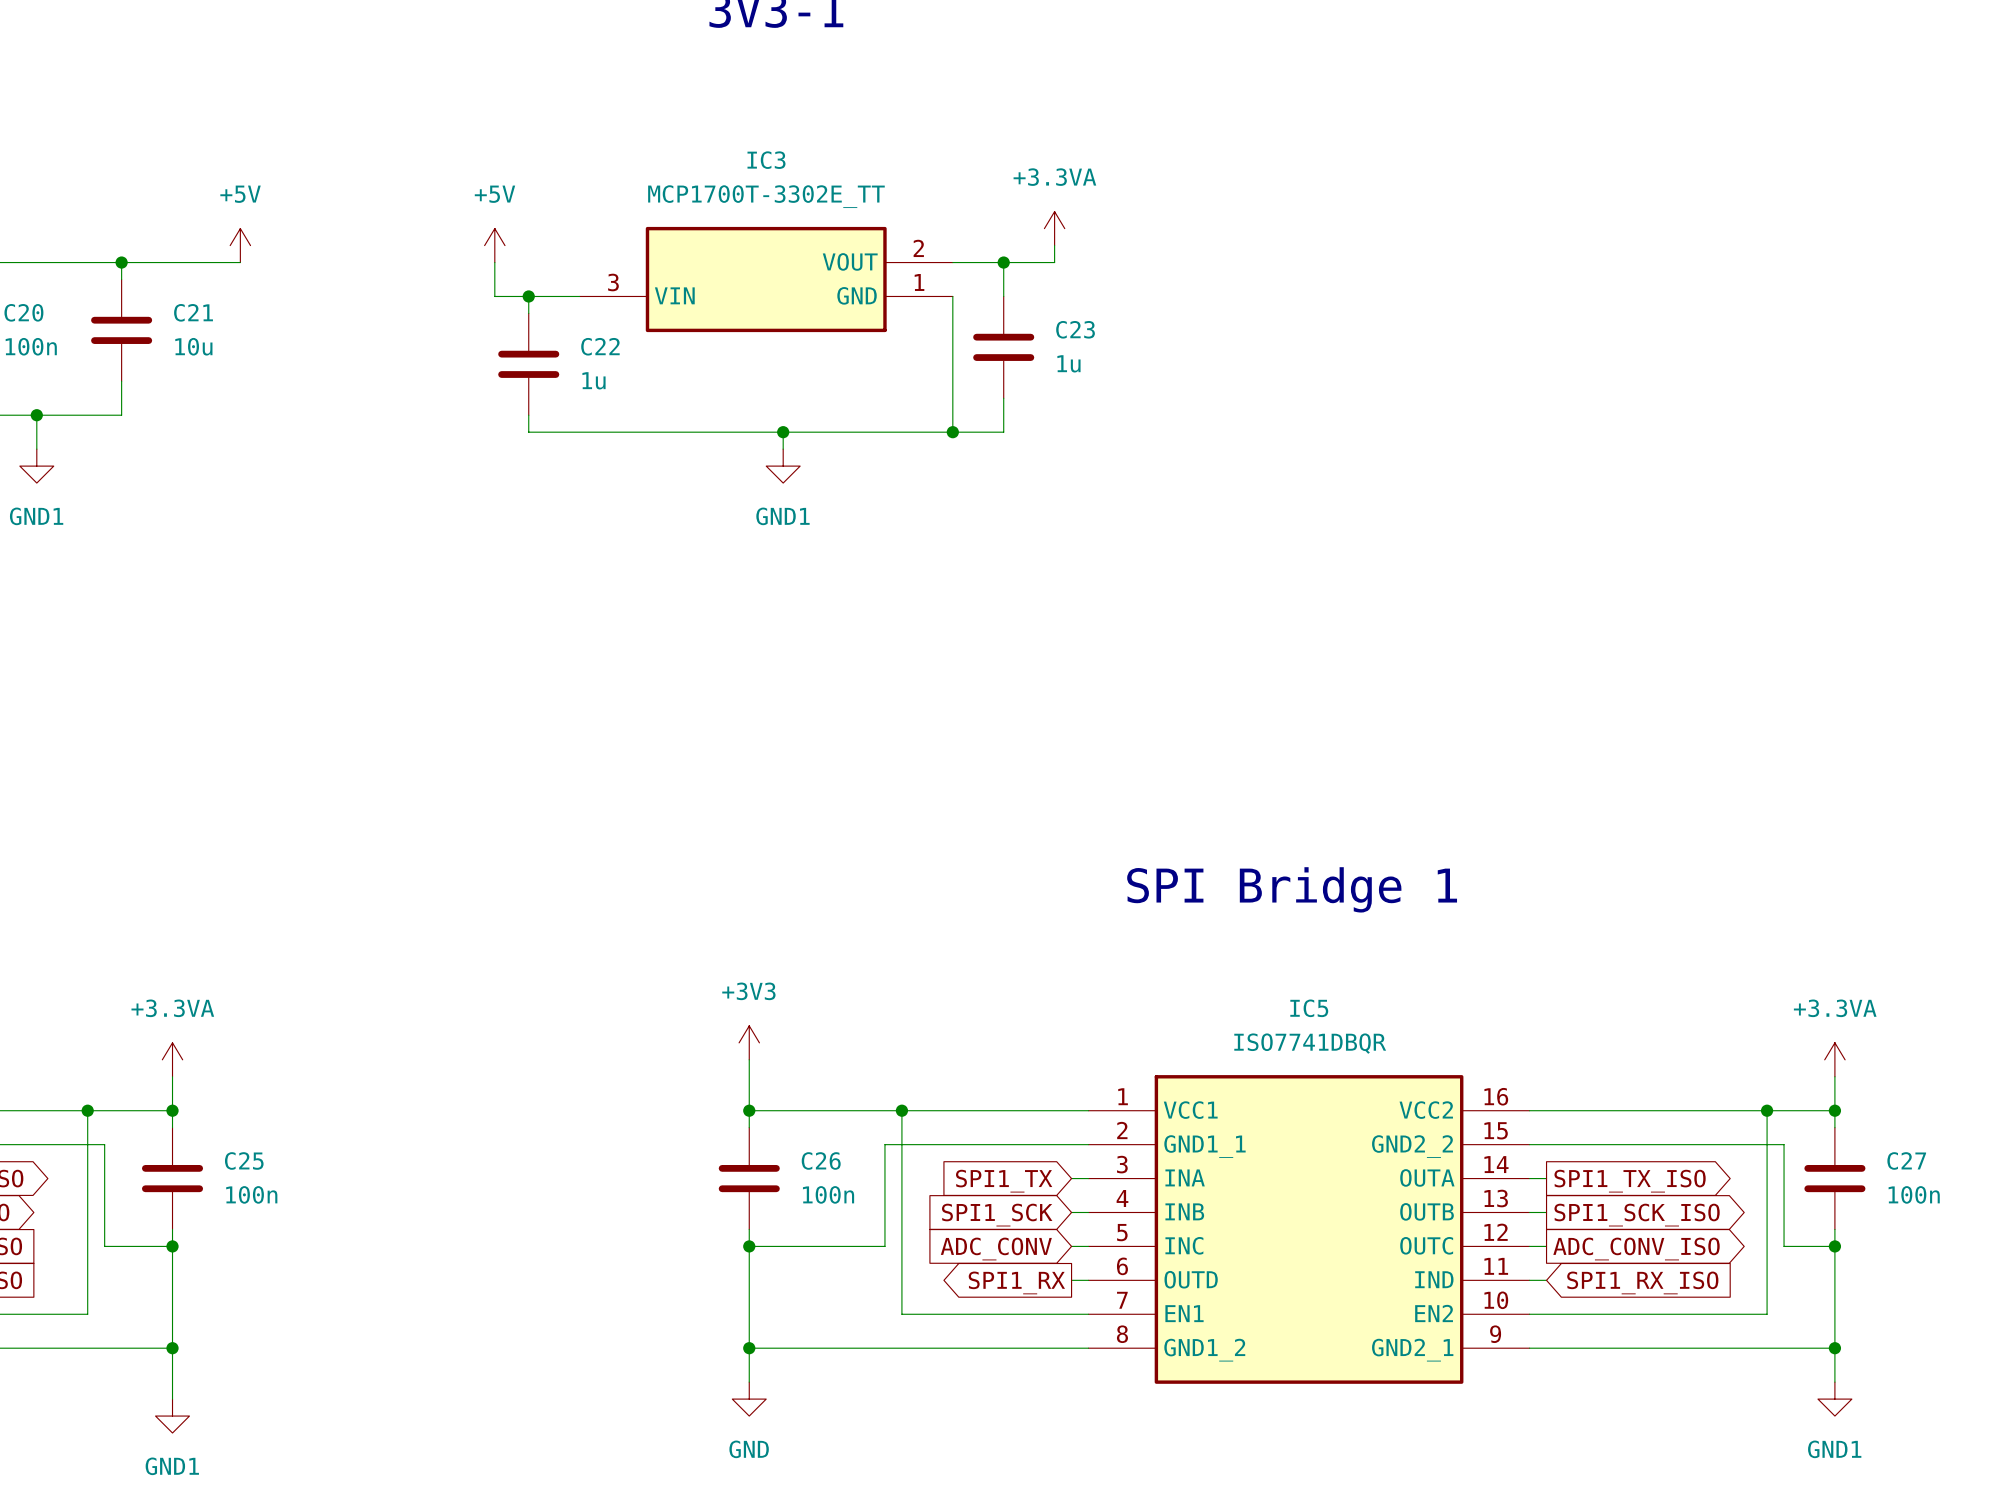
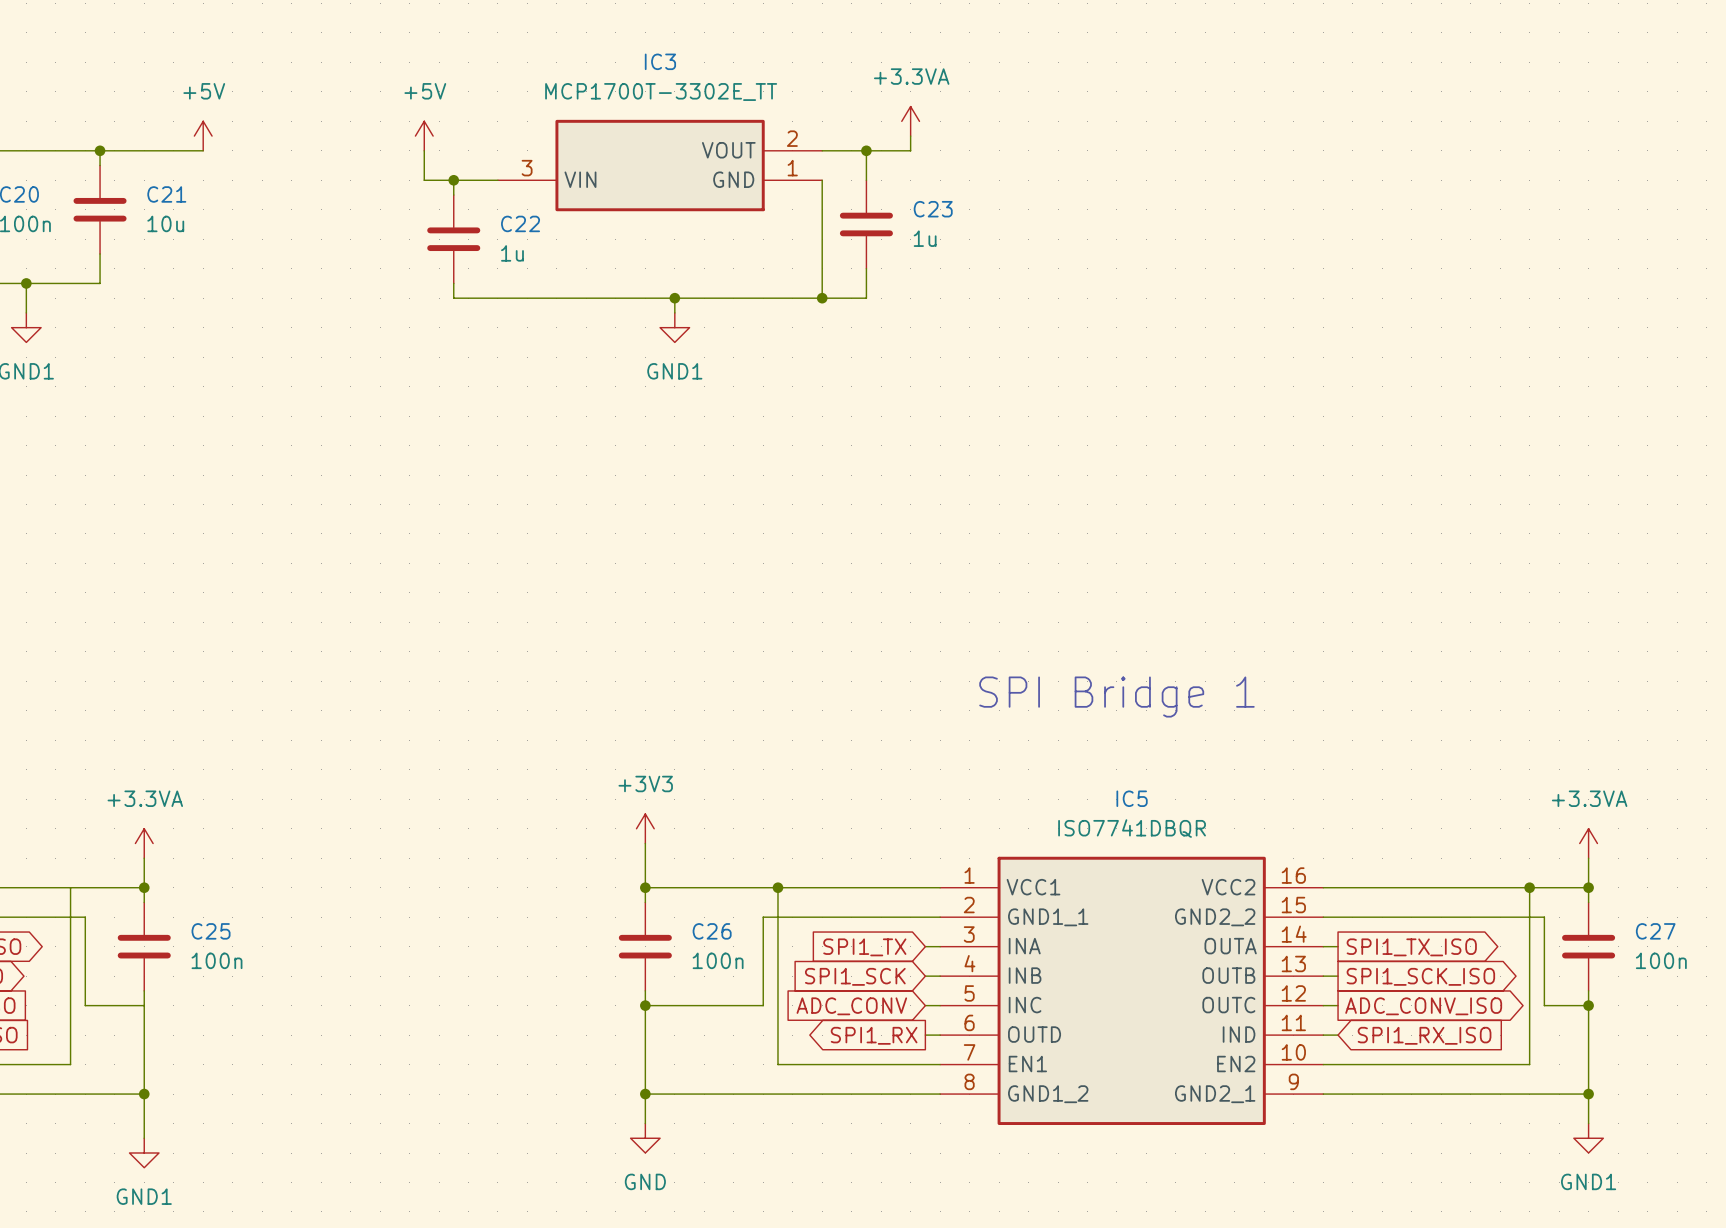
junction: (87, 1110) -> none
junction: (172, 1246) -> none

